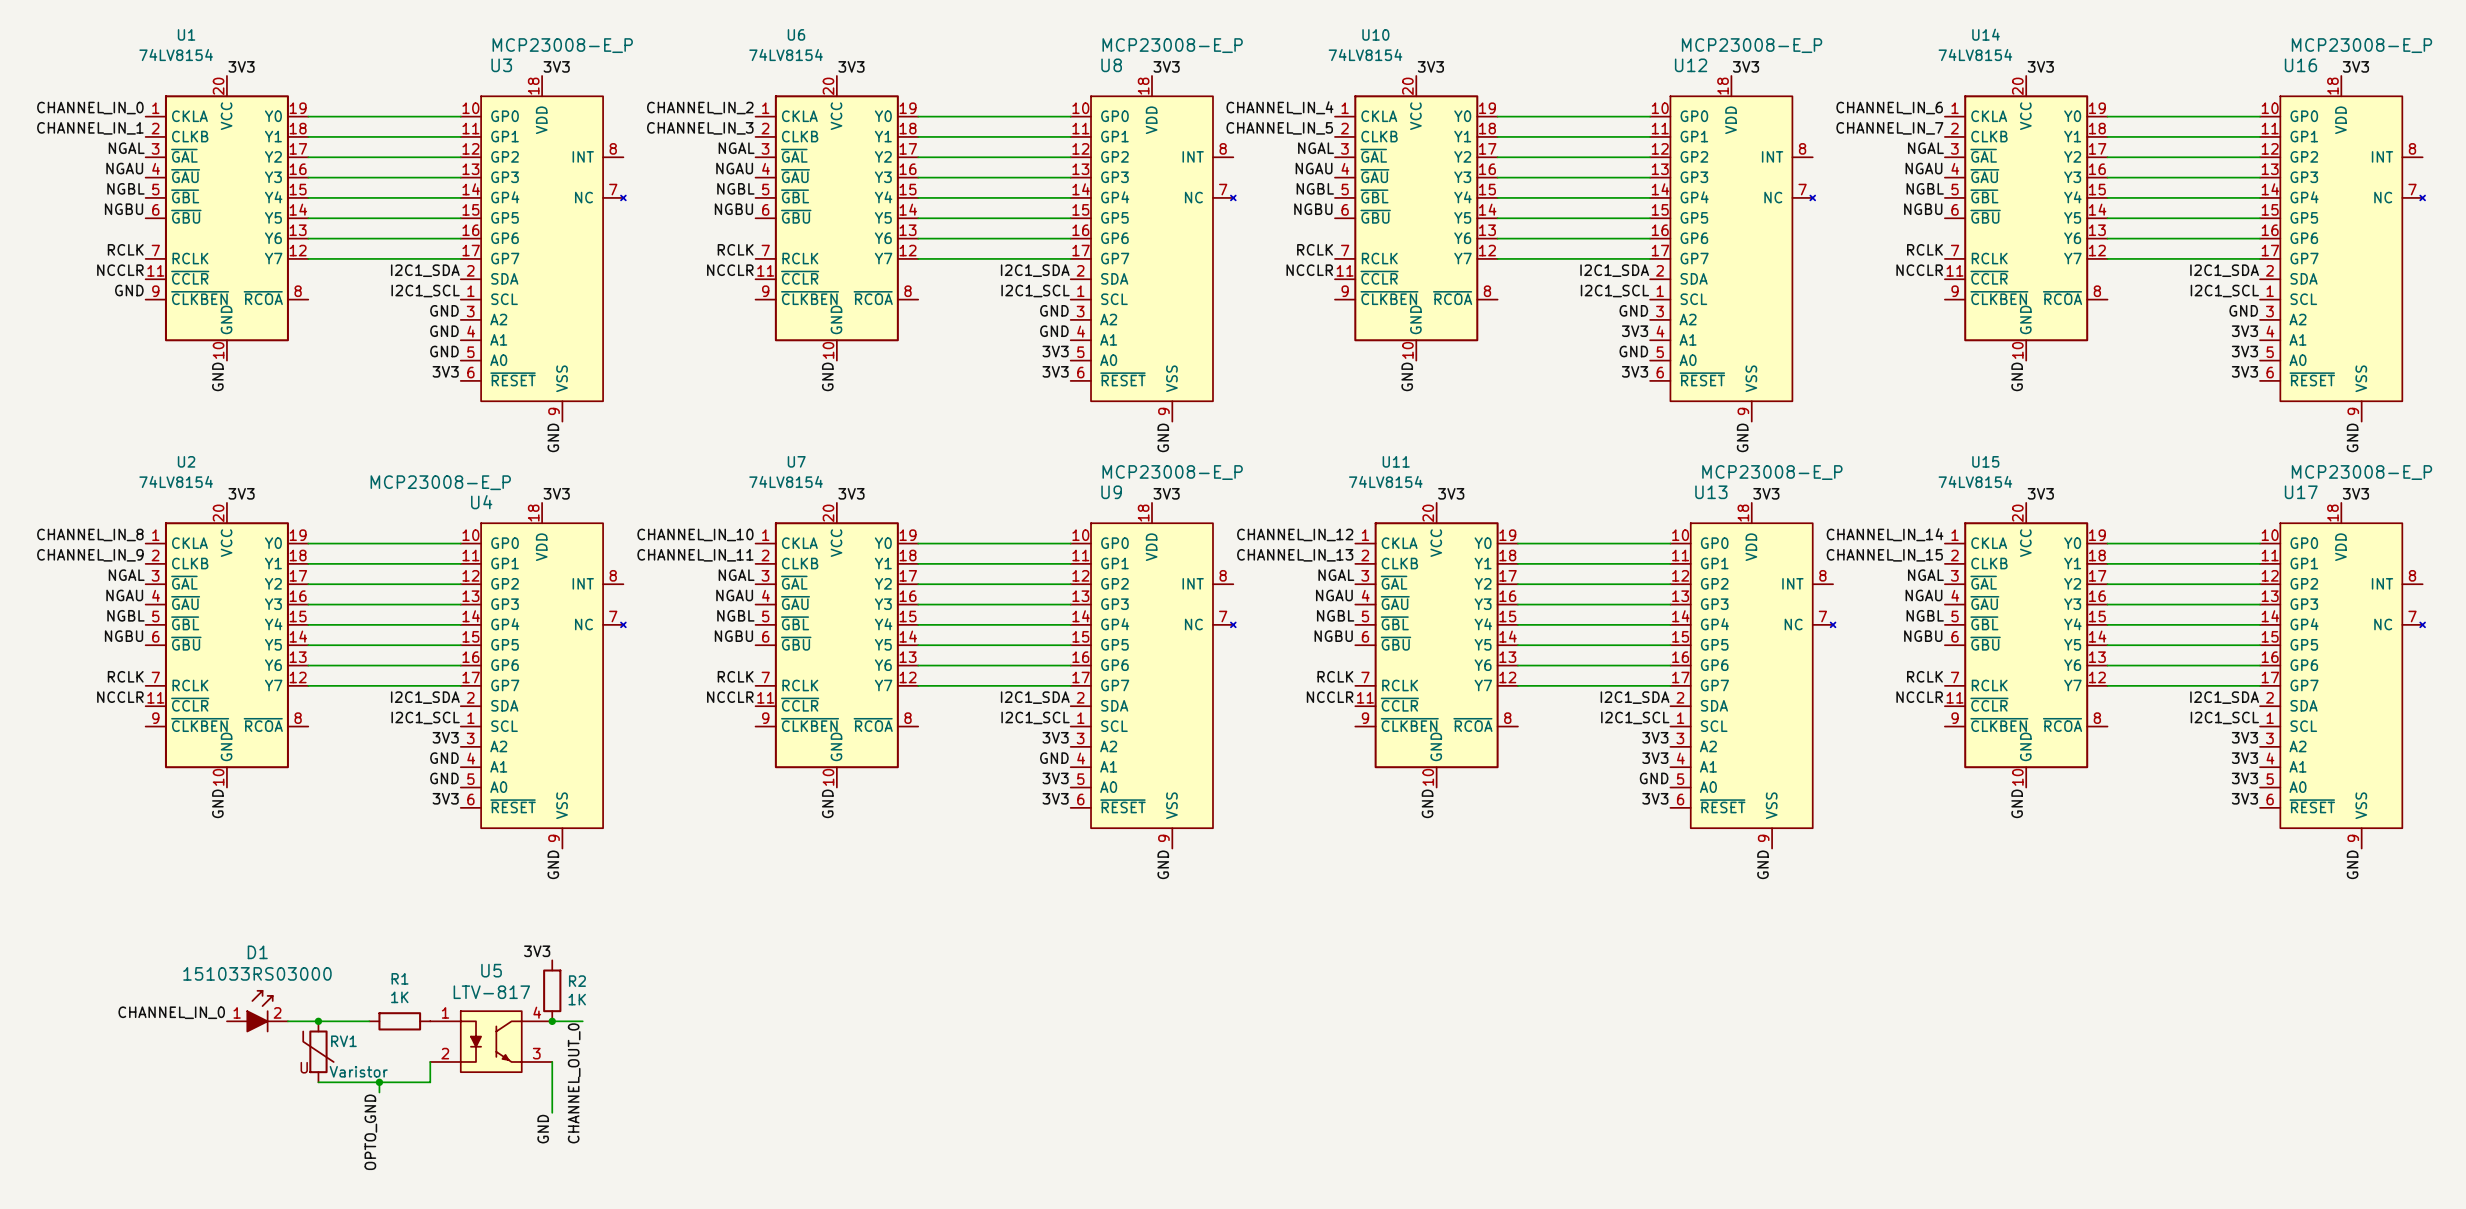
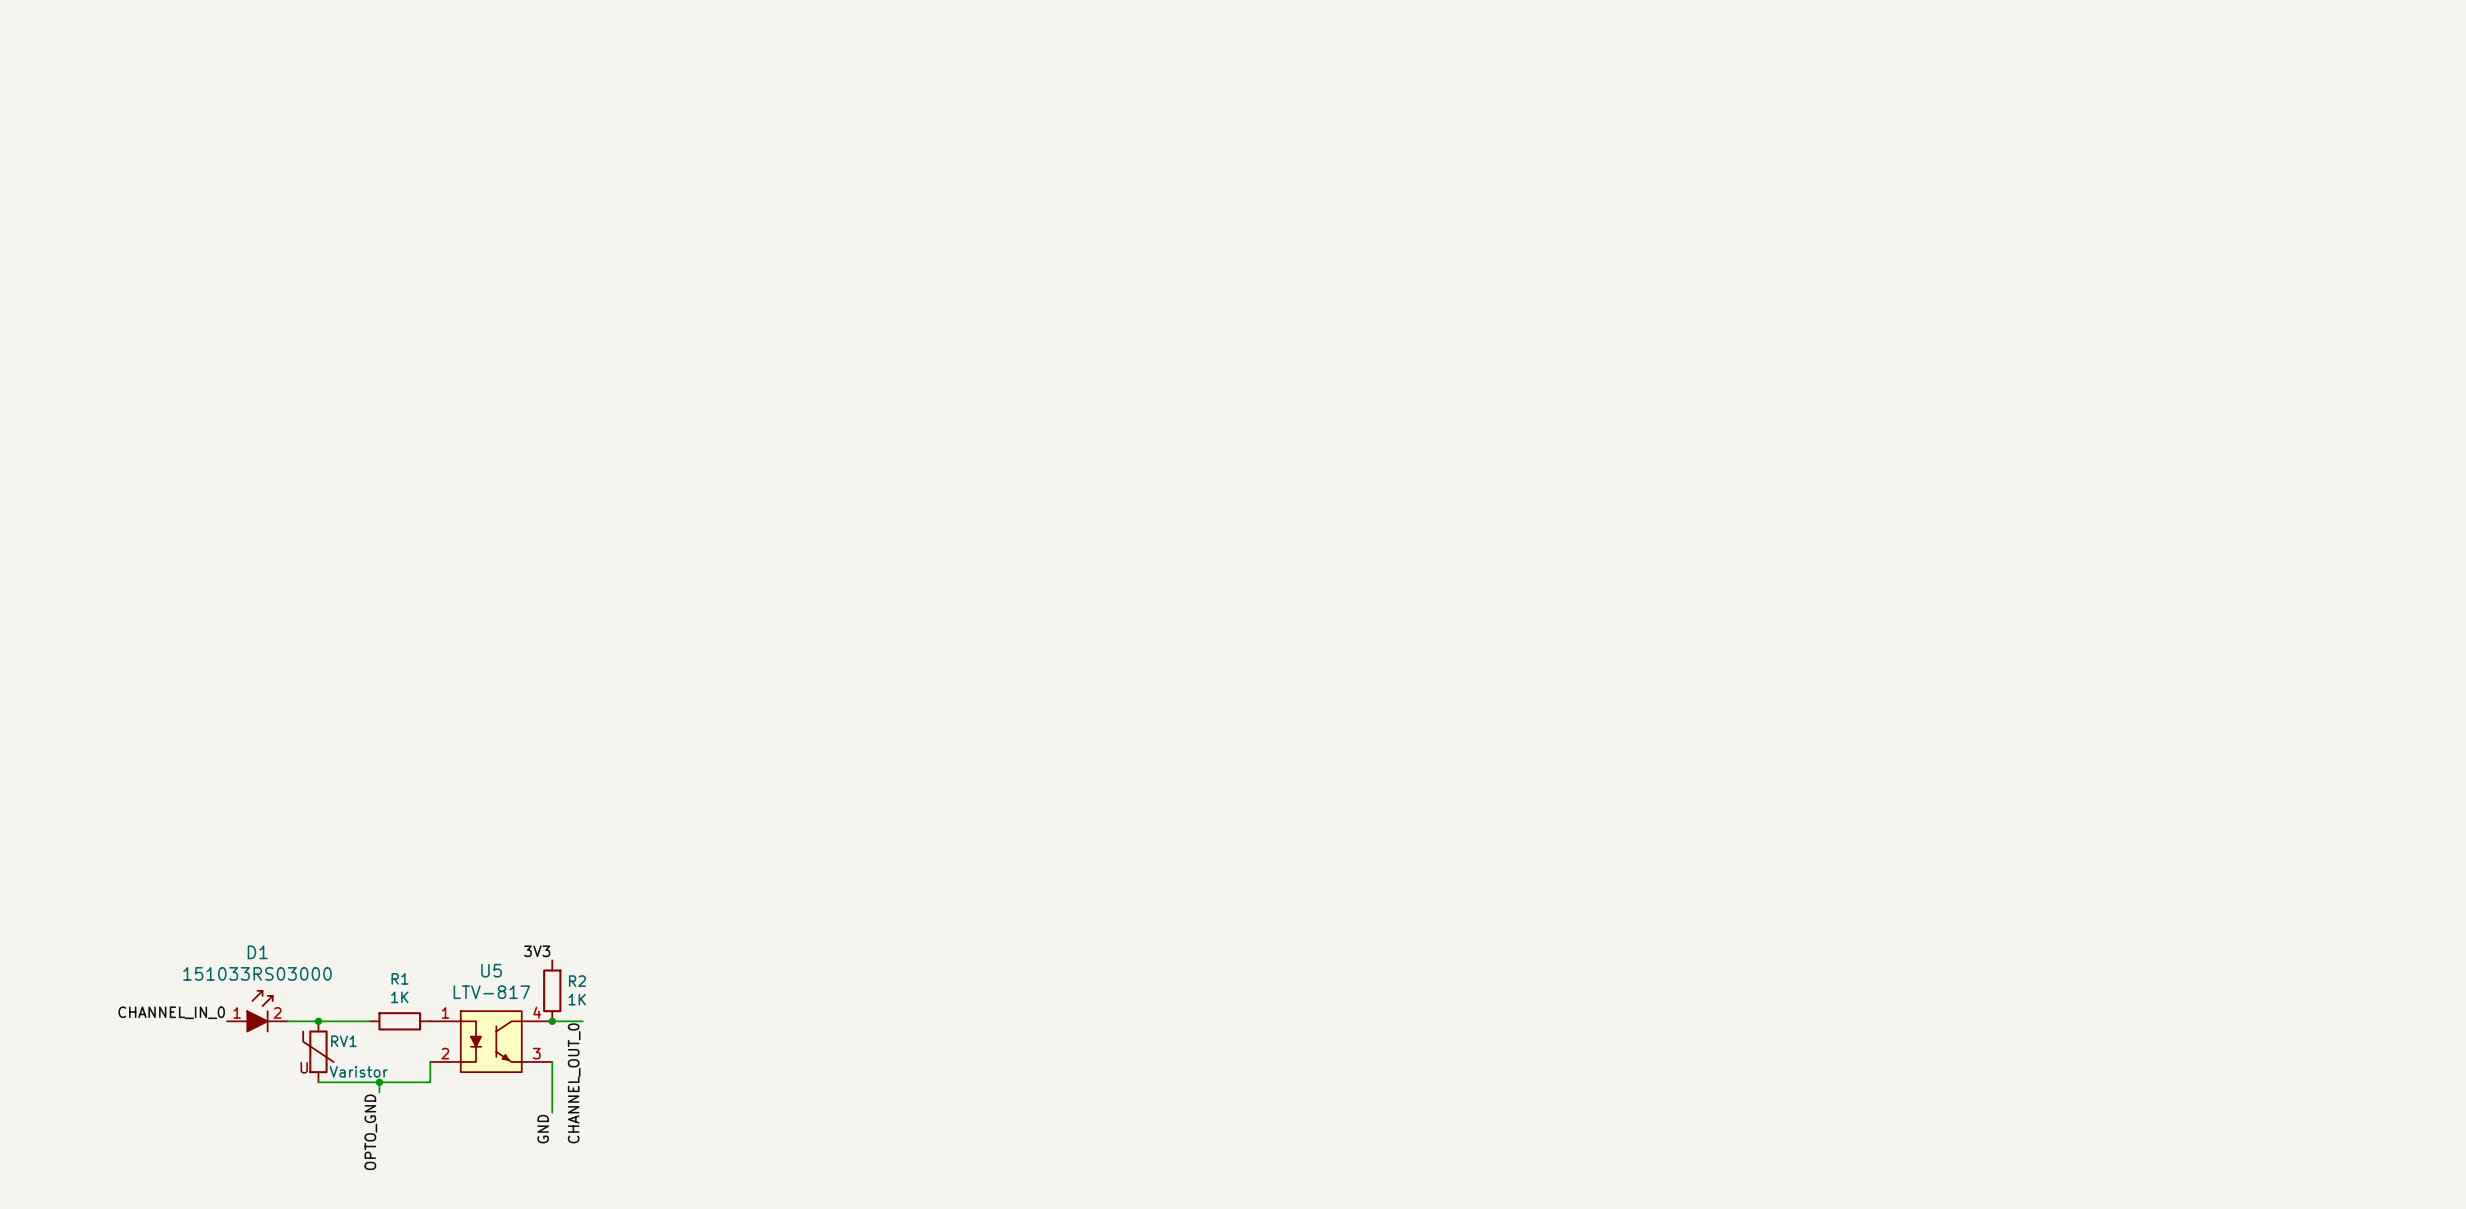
label: 3V3 (241, 66) -> none
label: 3V3 (556, 66) -> none
label: 3V3 (851, 66) -> none
label: 3V3 (1166, 66) -> none
label: 3V3 (1430, 66) -> none
label: 3V3 (1746, 66) -> none
label: 3V3 (2040, 66) -> none
label: 3V3 (2355, 66) -> none
label: CHANNEL_IN_4 (1279, 107) -> none
label: CHANNEL_IN_0 (90, 108) -> none
label: CHANNEL_IN_2 (700, 108) -> none
label: CHANNEL_IN_6 (1889, 108) -> none
wire: (308, 116) (460, 116) -> none
wire: (918, 116) (1070, 116) -> none
wire: (1497, 116) (1650, 116) -> none
wire: (2107, 116) (2260, 116) -> none
label: CHANNEL_IN_1 (90, 128) -> none
label: CHANNEL_IN_3 (700, 128) -> none
label: CHANNEL_IN_5 (1279, 128) -> none
label: CHANNEL_IN_7 (1889, 128) -> none
wire: (308, 136) (460, 136) -> none
wire: (918, 136) (1070, 136) -> none
wire: (1497, 136) (1650, 136) -> none
wire: (2107, 136) (2260, 136) -> none
label: NGAL (126, 148) -> none
label: NGAL (736, 148) -> none
label: NGAL (1316, 148) -> none
label: NGAL (1925, 148) -> none
wire: (308, 157) (460, 157) -> none
wire: (918, 157) (1070, 157) -> none
wire: (1497, 157) (1650, 157) -> none
wire: (2107, 157) (2260, 157) -> none
label: NGAU (124, 168) -> none
label: NGAU (734, 168) -> none
label: NGAU (1314, 168) -> none
label: NGAU (1923, 168) -> none
wire: (308, 177) (460, 177) -> none
wire: (918, 177) (1070, 177) -> none
wire: (1497, 177) (1650, 177) -> none
wire: (2107, 177) (2260, 177) -> none
label: NGBL (125, 188) -> none
label: NGBL (735, 188) -> none
label: NGBL (1315, 188) -> none
label: NGBL (1925, 188) -> none
wire: (308, 197) (460, 197) -> none
wire: (918, 197) (1070, 197) -> none
wire: (1497, 197) (1650, 197) -> none
wire: (2107, 197) (2260, 197) -> none
label: NGBU (124, 209) -> none
label: NGBU (733, 209) -> none
label: NGBU (1313, 209) -> none
label: NGBU (1923, 209) -> none
U1: 74LV8154 (226, 218) -> none
wire: (308, 218) (460, 218) -> none
U6: 74LV8154 (836, 218) -> none
wire: (918, 218) (1070, 218) -> none
U10: 74LV8154 (1416, 218) -> none
wire: (1497, 218) (1650, 218) -> none
U14: 74LV8154 (2026, 218) -> none
wire: (2107, 218) (2260, 218) -> none
wire: (308, 238) (460, 238) -> none
wire: (918, 238) (1070, 238) -> none
wire: (1497, 238) (1650, 238) -> none
wire: (2107, 238) (2260, 238) -> none
U3: MCP23008-E_P (543, 248) -> none
U8: MCP23008-E_P (1153, 248) -> none
U12: MCP23008-E_P (1732, 248) -> none
U16: MCP23008-E_P (2342, 248) -> none
label: RCLK (125, 249) -> none
label: RCLK (735, 249) -> none
label: RCLK (1315, 249) -> none
label: RCLK (1924, 249) -> none
wire: (308, 258) (460, 258) -> none
wire: (918, 258) (1070, 258) -> none
wire: (1497, 258) (1650, 258) -> none
wire: (2107, 258) (2260, 258) -> none
label: NCCLR (120, 270) -> none
label: I2C1_SDA (425, 270) -> none
label: NCCLR (730, 270) -> none
label: I2C1_SDA (1035, 270) -> none
label: NCCLR (1309, 270) -> none
label: I2C1_SDA (1614, 270) -> none
label: NCCLR (1919, 270) -> none
label: I2C1_SDA (2224, 270) -> none
label: GND (129, 290) -> none
label: I2C1_SCL (425, 291) -> none
label: I2C1_SCL (1035, 291) -> none
label: I2C1_SCL (1614, 291) -> none
label: I2C1_SCL (2224, 291) -> none
label: GND (444, 310) -> none
label: GND (1054, 310) -> none
label: GND (1633, 310) -> none
label: GND (2243, 310) -> none
label: GND (444, 331) -> none
label: GND (1054, 331) -> none
label: 3V3 (1635, 331) -> none
label: 3V3 (2244, 331) -> none
label: GND (444, 351) -> none
label: 3V3 (1055, 351) -> none
label: GND (1633, 351) -> none
label: 3V3 (2244, 351) -> none
label: 3V3 (445, 371) -> none
label: 3V3 (1055, 371) -> none
label: 3V3 (1635, 371) -> none
label: 3V3 (2244, 371) -> none
label: GND (217, 376) -> none
label: GND (827, 376) -> none
label: GND (1407, 376) -> none
label: GND (2017, 376) -> none
label: GND (553, 437) -> none
label: GND (1163, 437) -> none
label: GND (1742, 437) -> none
label: GND (2352, 437) -> none
label: 3V3 (241, 493) -> none
label: 3V3 (556, 493) -> none
label: 3V3 (851, 493) -> none
label: 3V3 (1166, 493) -> none
label: 3V3 (1451, 493) -> none
label: 3V3 (1766, 493) -> none
label: 3V3 (2040, 493) -> none
label: 3V3 (2355, 493) -> none
label: CHANNEL_IN_8 (90, 534) -> none
label: CHANNEL_IN_10 (695, 534) -> none
label: CHANNEL_IN_12 (1295, 534) -> none
label: CHANNEL_IN_14 (1885, 534) -> none
wire: (308, 543) (460, 543) -> none
wire: (918, 543) (1070, 543) -> none
wire: (1517, 543) (1670, 543) -> none
wire: (2107, 543) (2260, 543) -> none
label: CHANNEL_IN_9 (90, 555) -> none
label: CHANNEL_IN_11 (695, 555) -> none
label: CHANNEL_IN_13 (1295, 555) -> none
label: CHANNEL_IN_15 (1884, 555) -> none
wire: (308, 563) (460, 563) -> none
wire: (918, 563) (1070, 563) -> none
wire: (1517, 563) (1670, 563) -> none
wire: (2107, 563) (2260, 563) -> none
label: NGAL (126, 575) -> none
label: NGAL (736, 575) -> none
label: NGAL (1336, 575) -> none
label: NGAL (1925, 575) -> none
wire: (308, 584) (460, 584) -> none
wire: (918, 584) (1070, 584) -> none
wire: (1517, 584) (1670, 584) -> none
wire: (2107, 584) (2260, 584) -> none
label: NGAU (124, 595) -> none
label: NGAU (734, 595) -> none
label: NGAU (1334, 595) -> none
label: NGAU (1923, 595) -> none
wire: (308, 604) (460, 604) -> none
wire: (918, 604) (1070, 604) -> none
wire: (1517, 604) (1670, 604) -> none
wire: (2107, 604) (2260, 604) -> none
label: NGBL (125, 615) -> none
label: NGBL (735, 615) -> none
label: NGBL (1335, 615) -> none
label: NGBL (1925, 615) -> none
wire: (308, 624) (460, 624) -> none
wire: (918, 624) (1070, 624) -> none
wire: (1517, 624) (1670, 624) -> none
wire: (2107, 624) (2260, 624) -> none
label: NGBU (124, 636) -> none
label: NGBU (733, 636) -> none
label: NGBU (1333, 636) -> none
label: NGBU (1923, 636) -> none
U2: 74LV8154 (226, 645) -> none
wire: (308, 645) (460, 645) -> none
U7: 74LV8154 (836, 645) -> none
wire: (918, 645) (1070, 645) -> none
U11: 74LV8154 (1436, 645) -> none
wire: (1517, 645) (1670, 645) -> none
U15: 74LV8154 (2026, 645) -> none
wire: (2107, 645) (2260, 645) -> none
wire: (308, 665) (460, 665) -> none
wire: (918, 665) (1070, 665) -> none
wire: (1517, 665) (1670, 665) -> none
wire: (2107, 665) (2260, 665) -> none
U4: MCP23008-E_P (543, 675) -> none
U9: MCP23008-E_P (1153, 675) -> none
U13: MCP23008-E_P (1752, 675) -> none
U17: MCP23008-E_P (2342, 675) -> none
label: RCLK (125, 676) -> none
label: RCLK (735, 676) -> none
label: RCLK (1335, 676) -> none
label: RCLK (1924, 676) -> none
wire: (308, 685) (460, 685) -> none
wire: (918, 685) (1070, 685) -> none
wire: (1517, 685) (1670, 685) -> none
wire: (2107, 685) (2260, 685) -> none
label: NCCLR (120, 697) -> none
label: I2C1_SDA (425, 697) -> none
label: NCCLR (730, 697) -> none
label: I2C1_SDA (1035, 697) -> none
label: NCCLR (1330, 697) -> none
label: I2C1_SDA (1635, 697) -> none
label: NCCLR (1919, 697) -> none
label: I2C1_SDA (2224, 697) -> none
label: I2C1_SCL (425, 717) -> none
label: I2C1_SCL (1035, 717) -> none
label: I2C1_SCL (1635, 717) -> none
label: I2C1_SCL (2224, 717) -> none
label: 3V3 (445, 737) -> none
label: 3V3 (1055, 737) -> none
label: 3V3 (1655, 737) -> none
label: 3V3 (2244, 737) -> none
label: GND (444, 758) -> none
label: GND (1054, 758) -> none
label: 3V3 (1655, 758) -> none
label: 3V3 (2244, 758) -> none
label: GND (444, 778) -> none
label: 3V3 (1055, 778) -> none
label: GND (1654, 778) -> none
label: 3V3 (2244, 778) -> none
label: 3V3 (445, 798) -> none
label: 3V3 (1055, 798) -> none
label: 3V3 (1655, 798) -> none
label: 3V3 (2244, 798) -> none
label: GND (217, 803) -> none
label: GND (827, 803) -> none
label: GND (1427, 803) -> none
label: GND (2017, 803) -> none
label: GND (553, 864) -> none
label: GND (1163, 864) -> none
label: GND (1763, 864) -> none
label: GND (2352, 864) -> none

